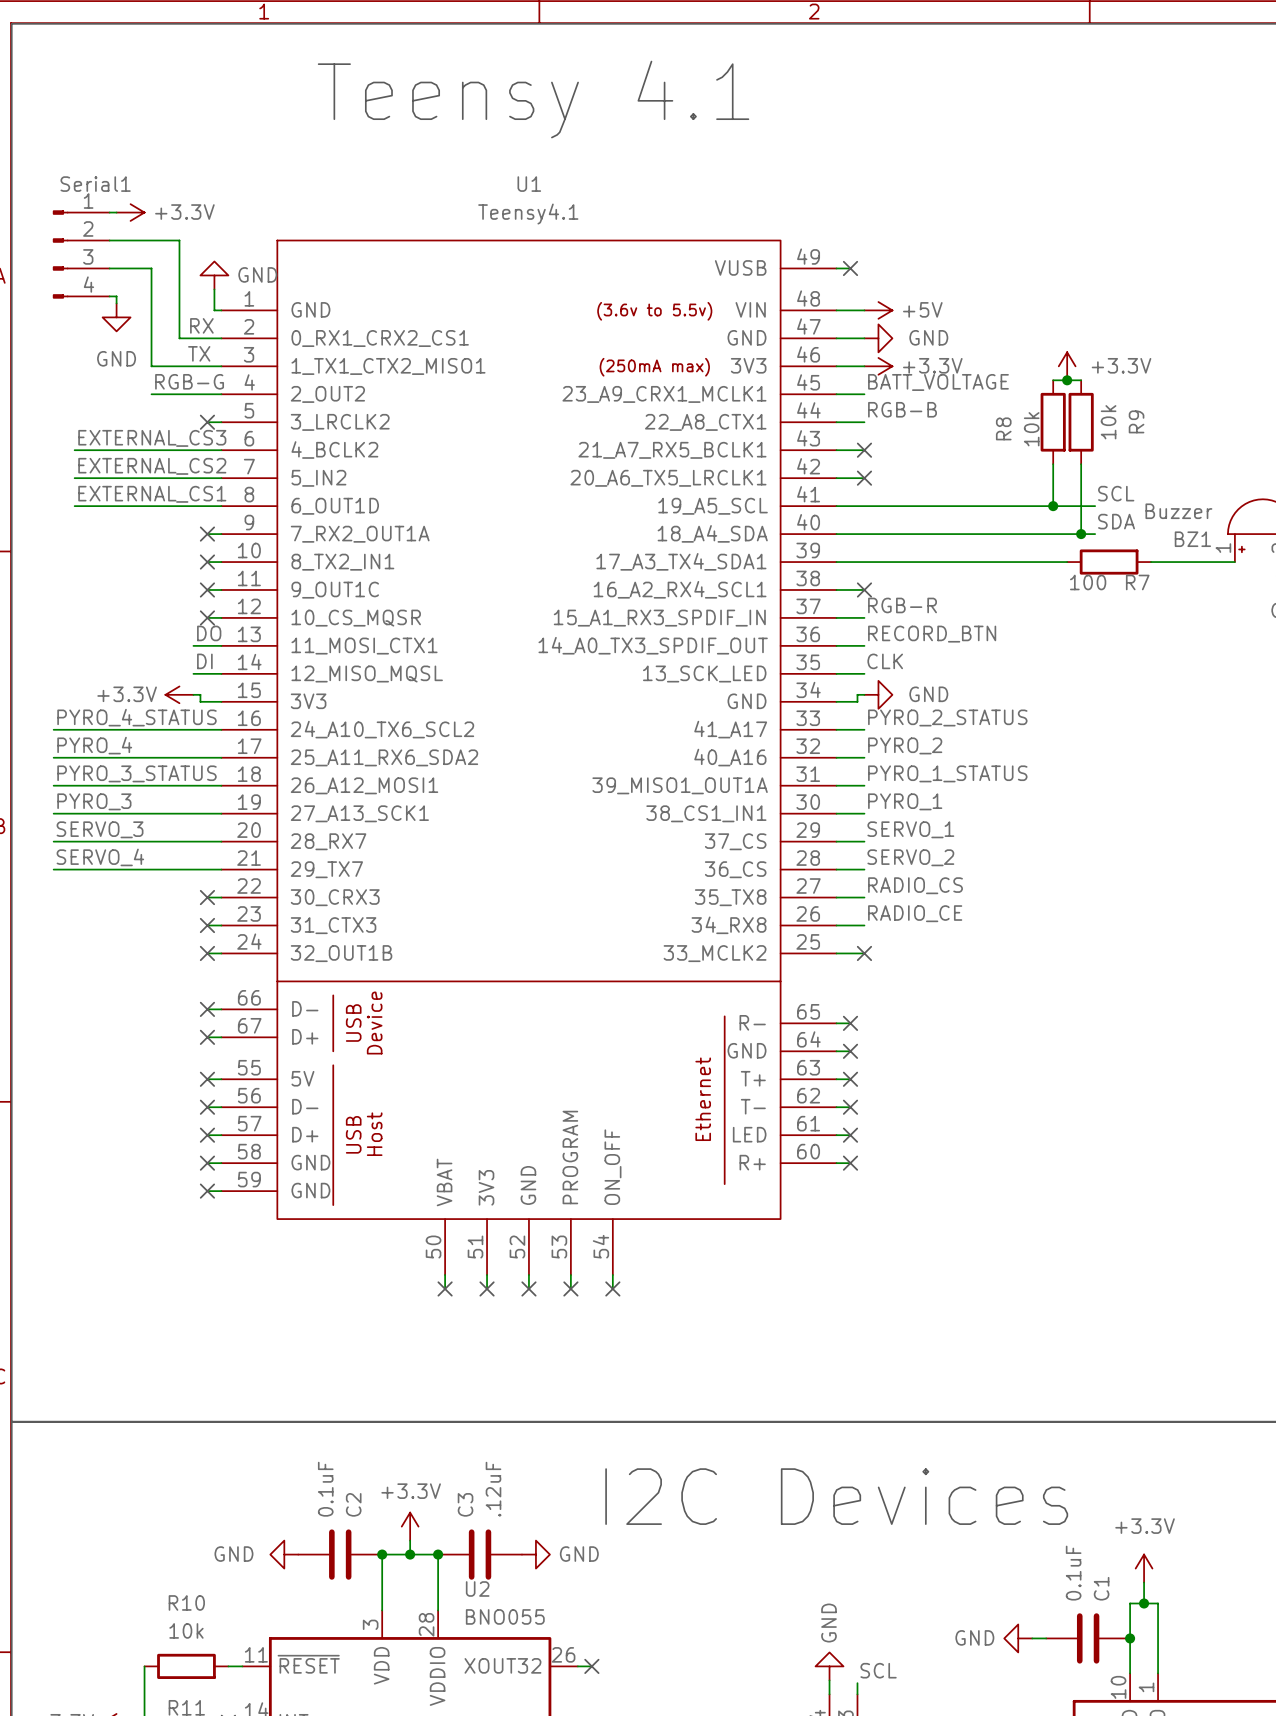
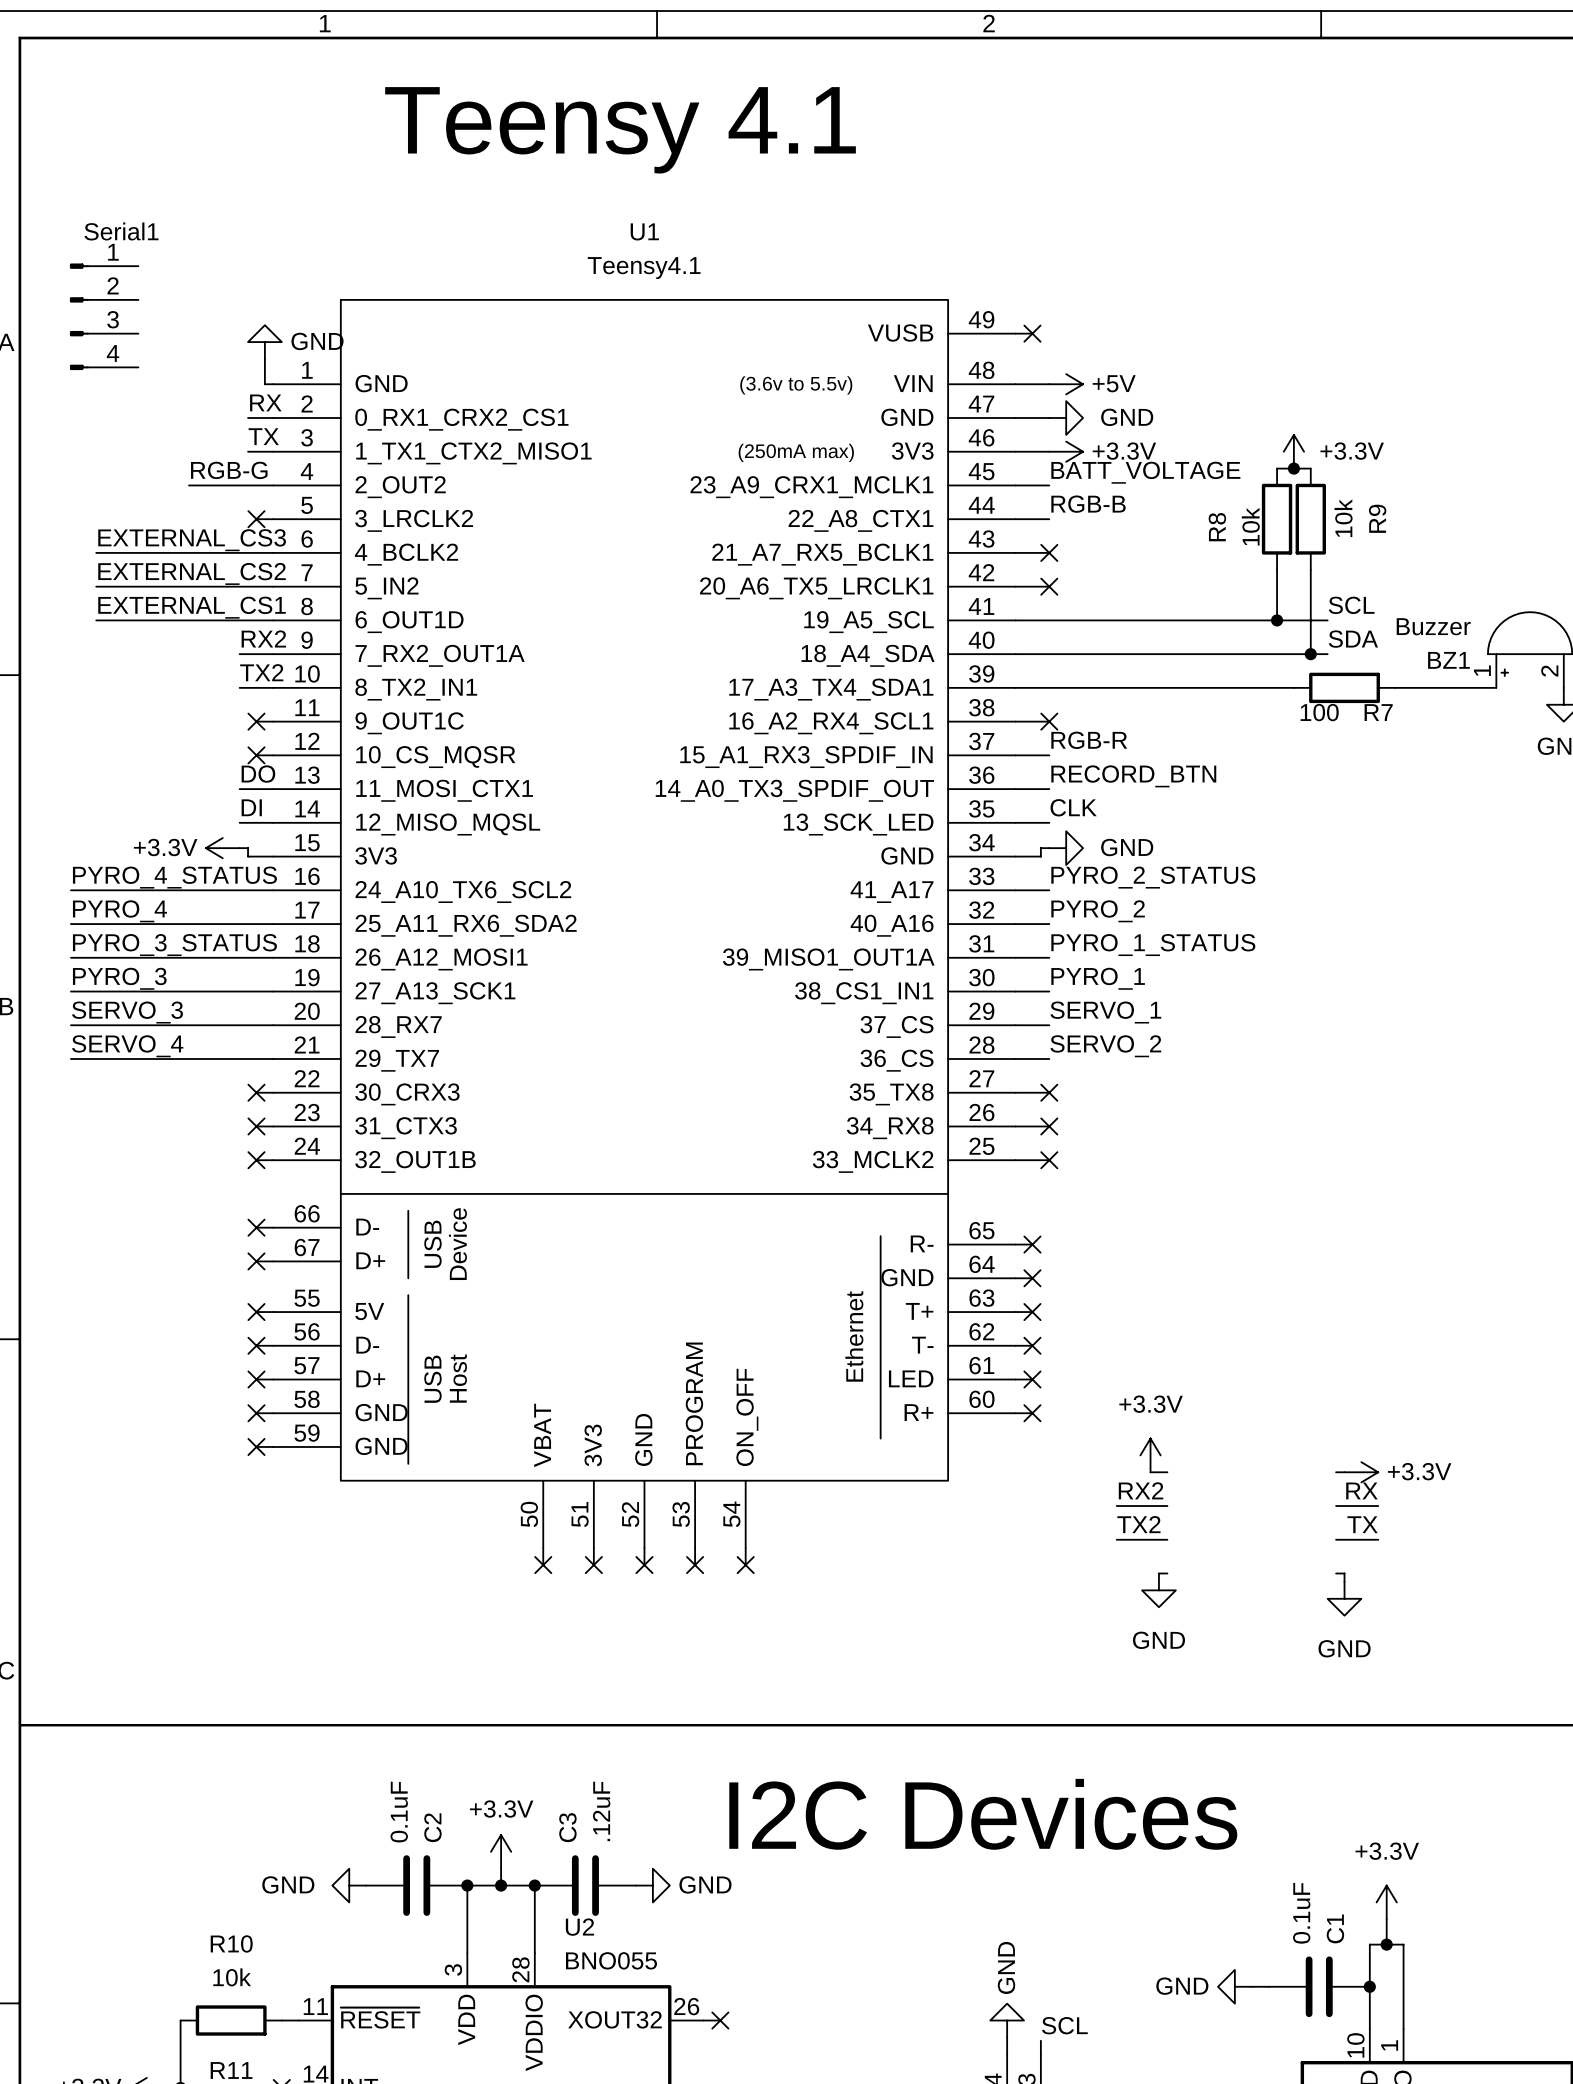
wire: (109, 212) (116, 212) -> none
power symbol: +3.3V (130, 212) -> none
wire: (109, 240) (179, 240) (179, 338) (200, 338) -> none
wire: (109, 268) (151, 268) (151, 366) (200, 366) -> none
wire: (109, 296) (116, 296) (116, 303) -> none
power symbol: GND (116, 317) -> none
label position: RX (201, 325) -> RX (265, 402)
label position: TX (199, 353) -> TX (263, 436)
label: none -> RX2 (263, 638)
wire: none -> (239, 654) (256, 654)
no-connect mark: (207, 534) -> none
label: none -> TX2 (261, 672)
wire: none -> (239, 687) (256, 687)
no-connect mark: (207, 562) -> none
label: RADIO_CS (915, 885) -> none
no-connect mark: none -> (1049, 1092)
label: RADIO_CE (915, 913) -> none
no-connect mark: none -> (1049, 1126)
power symbol: none -> +3.3V (1150, 1455)
wire: none -> (1150, 1472) (1167, 1472)
wire: none -> (1336, 1472) (1344, 1472)
power symbol: none -> +3.3V (1361, 1472)
label: none -> RX2 (1141, 1490)
label: none -> RX (1361, 1490)
wire: none -> (1116, 1506) (1167, 1506)
wire: none -> (1336, 1506) (1378, 1506)
label: none -> TX2 (1138, 1524)
label: none -> TX (1362, 1524)
wire: none -> (1116, 1539) (1167, 1539)
wire: none -> (1336, 1539) (1378, 1539)
wire: none -> (1158, 1573) (1167, 1573)
wire: none -> (1336, 1573) (1344, 1573) (1344, 1581)
power symbol: none -> GND (1158, 1590)
power symbol: none -> GND (1344, 1598)

